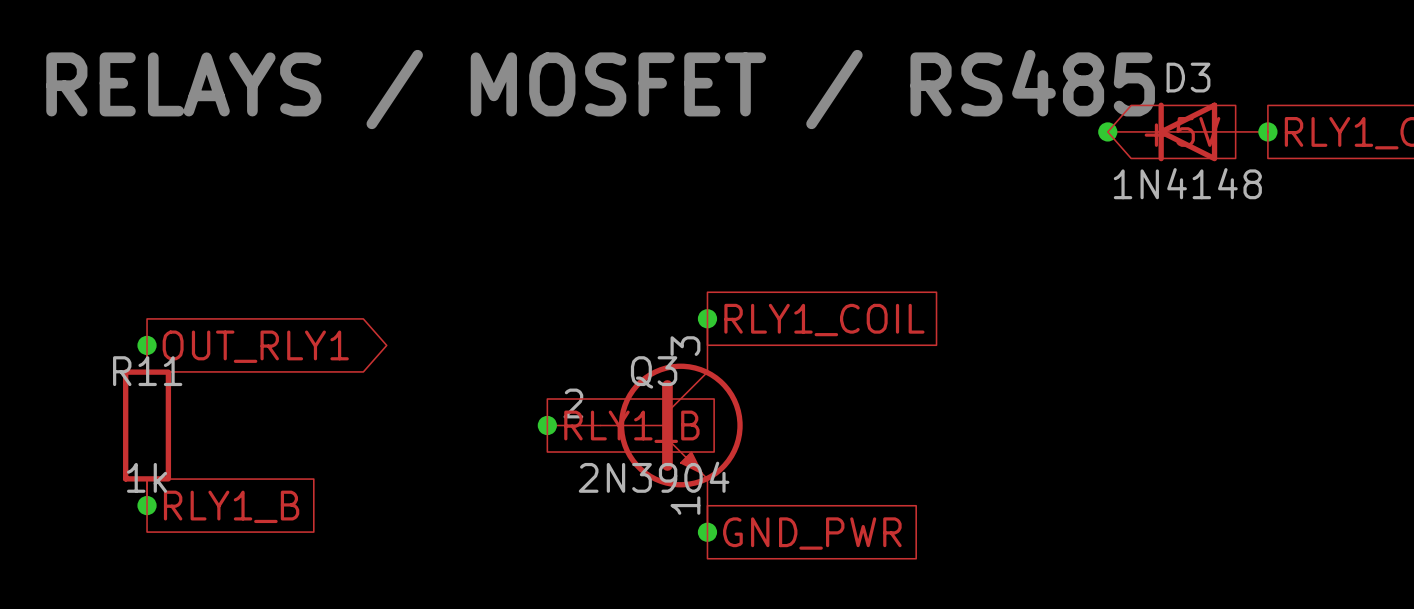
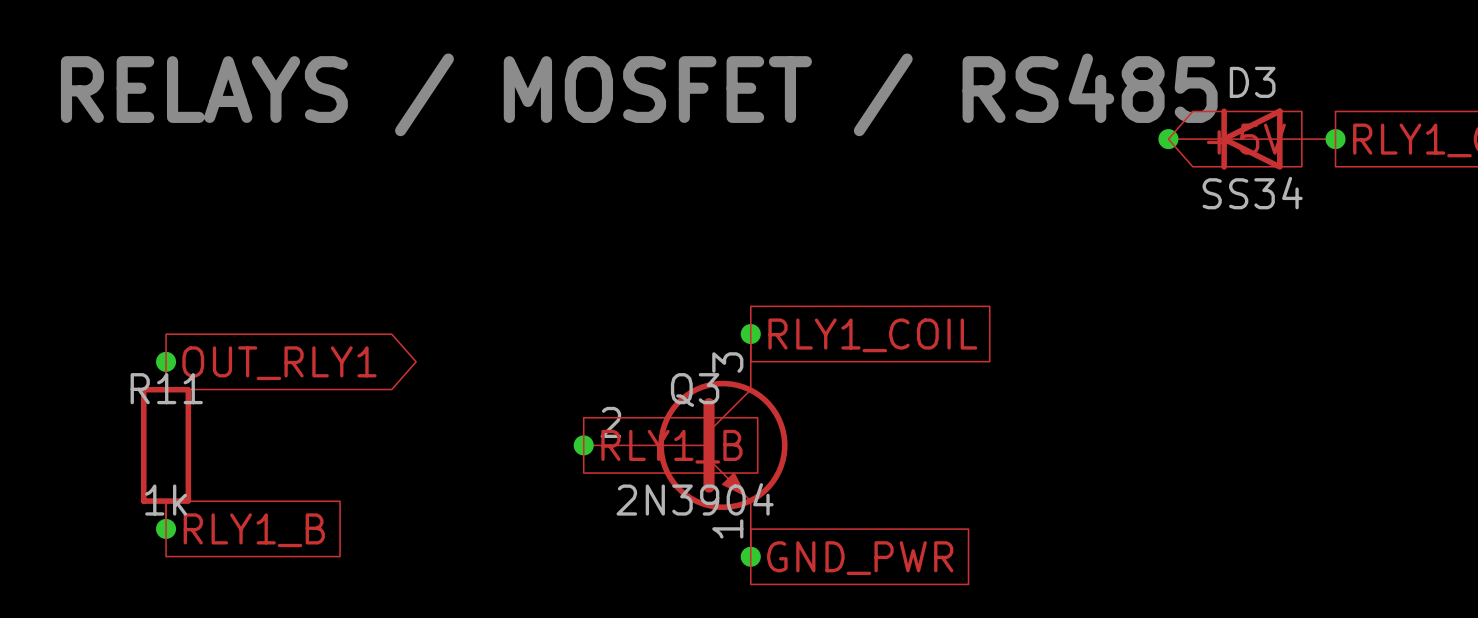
D3 value: 1N4148 (1187, 183) -> SS34 (1252, 193)

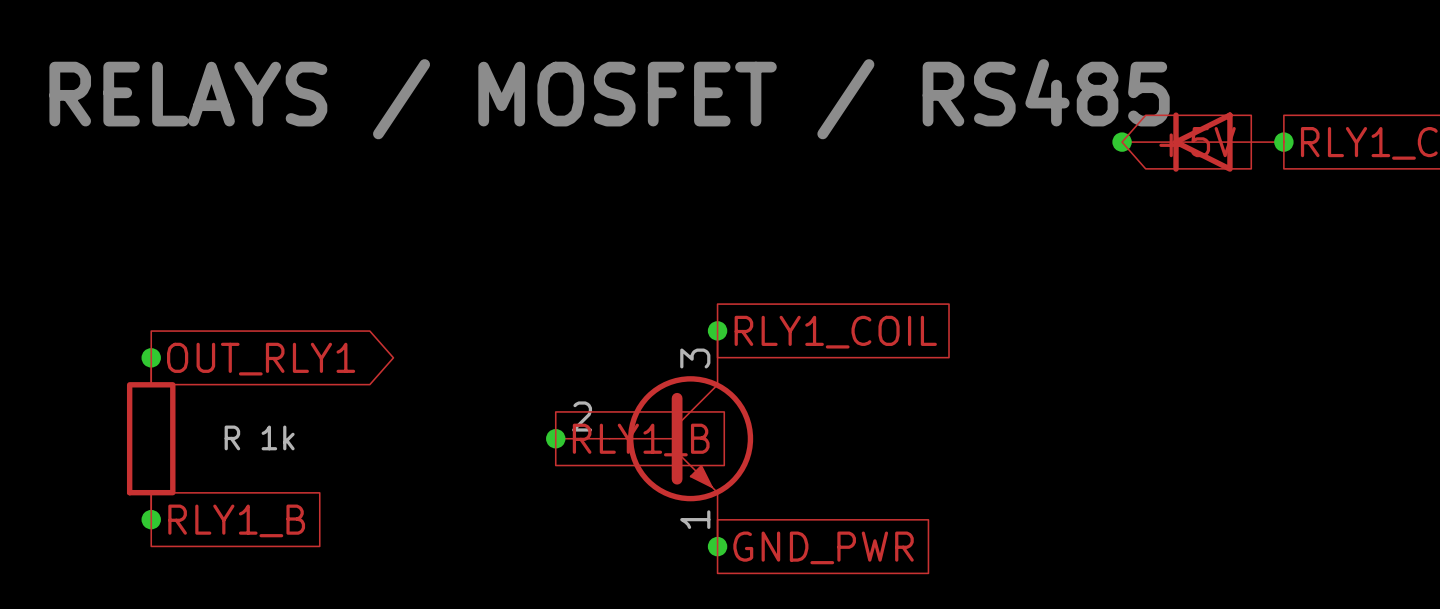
D3 name: D3 (1252, 82) -> none
D3 value: SS34 (1252, 193) -> none
R11 name: R11 (166, 388) -> none
Q3 name: Q3 (695, 389) -> none
Q3 value: 2N3904 (695, 499) -> none
R11 value: 1k (166, 500) -> R 1k (259, 437)

